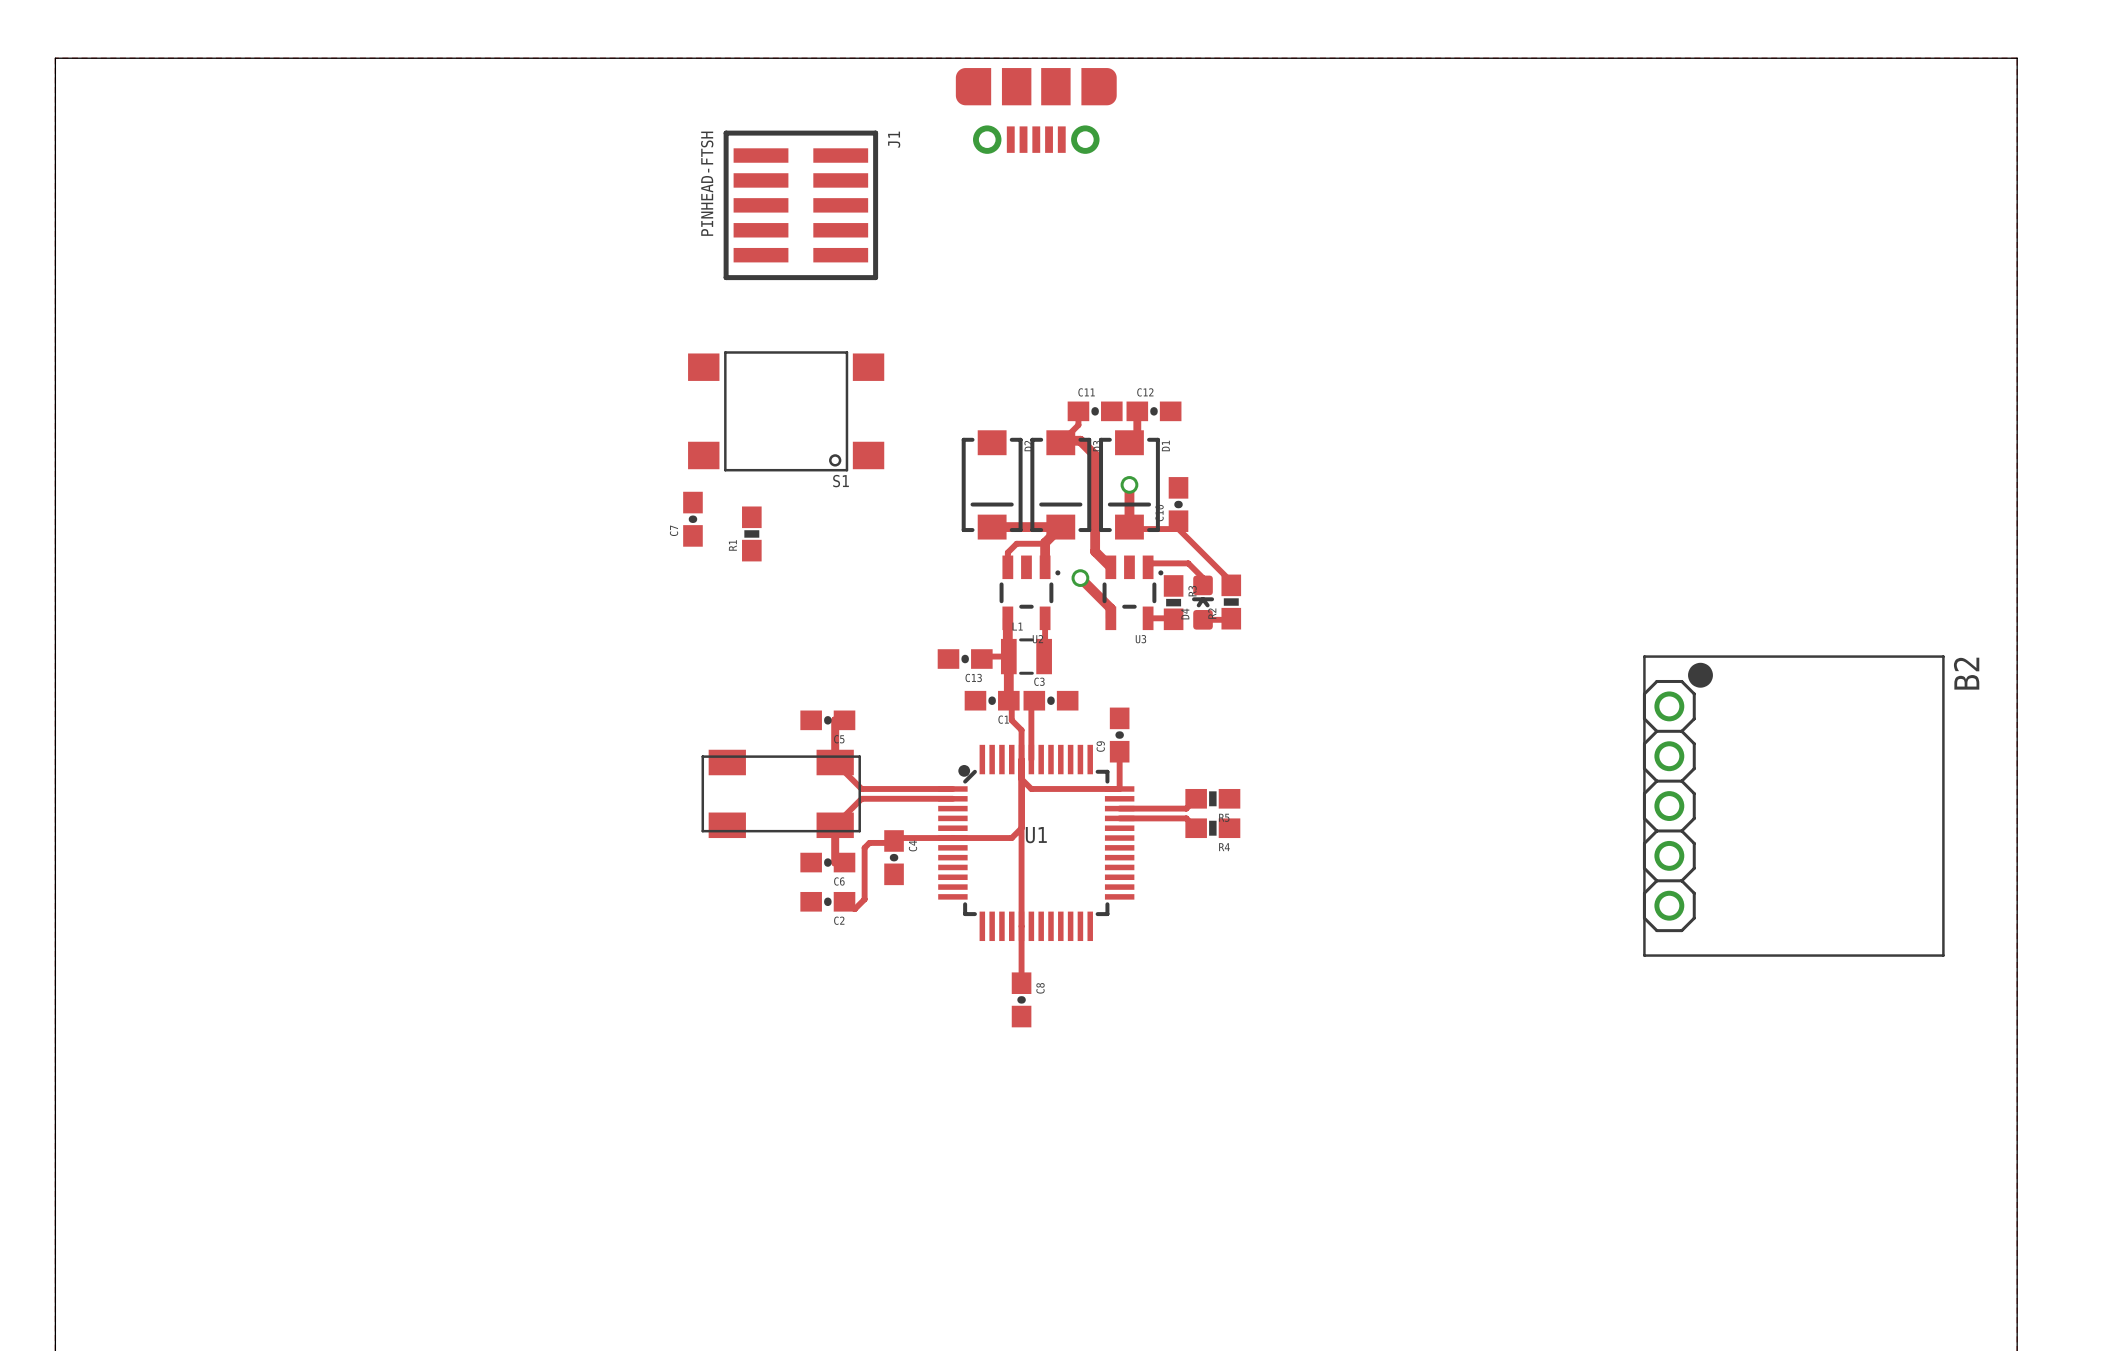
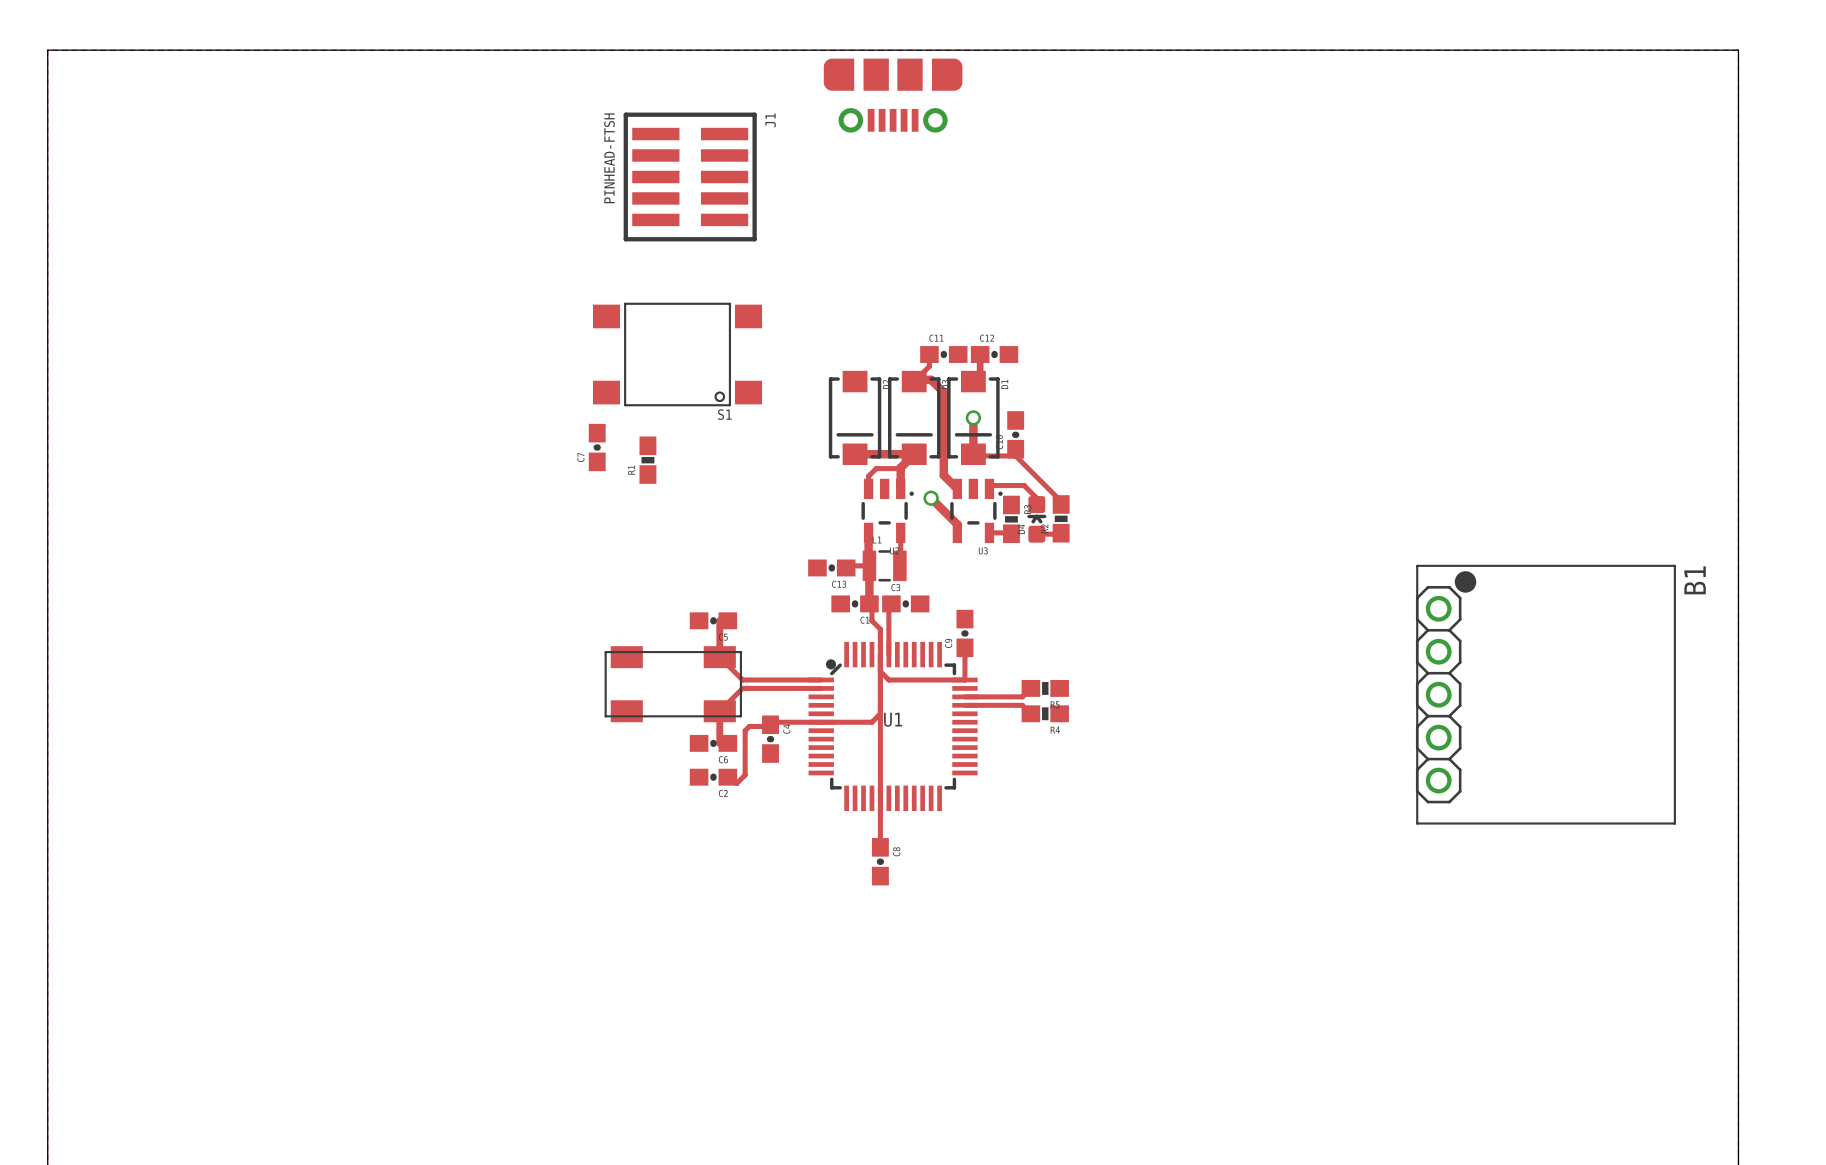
B2 name: B2 (1966, 673) -> B1 (1695, 580)

